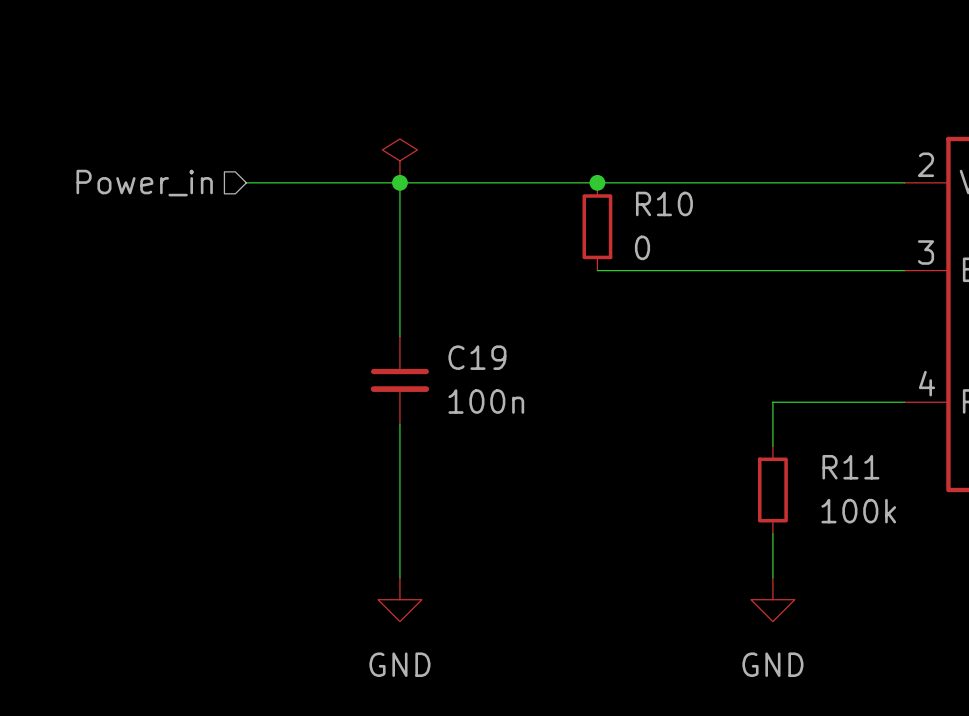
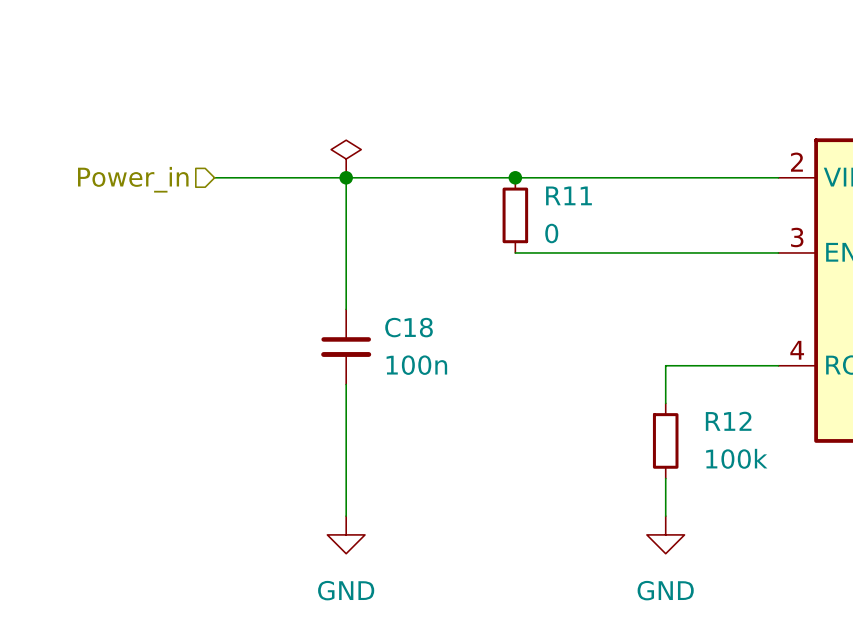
R10 name: R10 (664, 203) -> R11 (568, 195)
C19 name: C19 (477, 357) -> C18 (409, 327)
R11 name: R11 (850, 467) -> R12 (728, 421)

